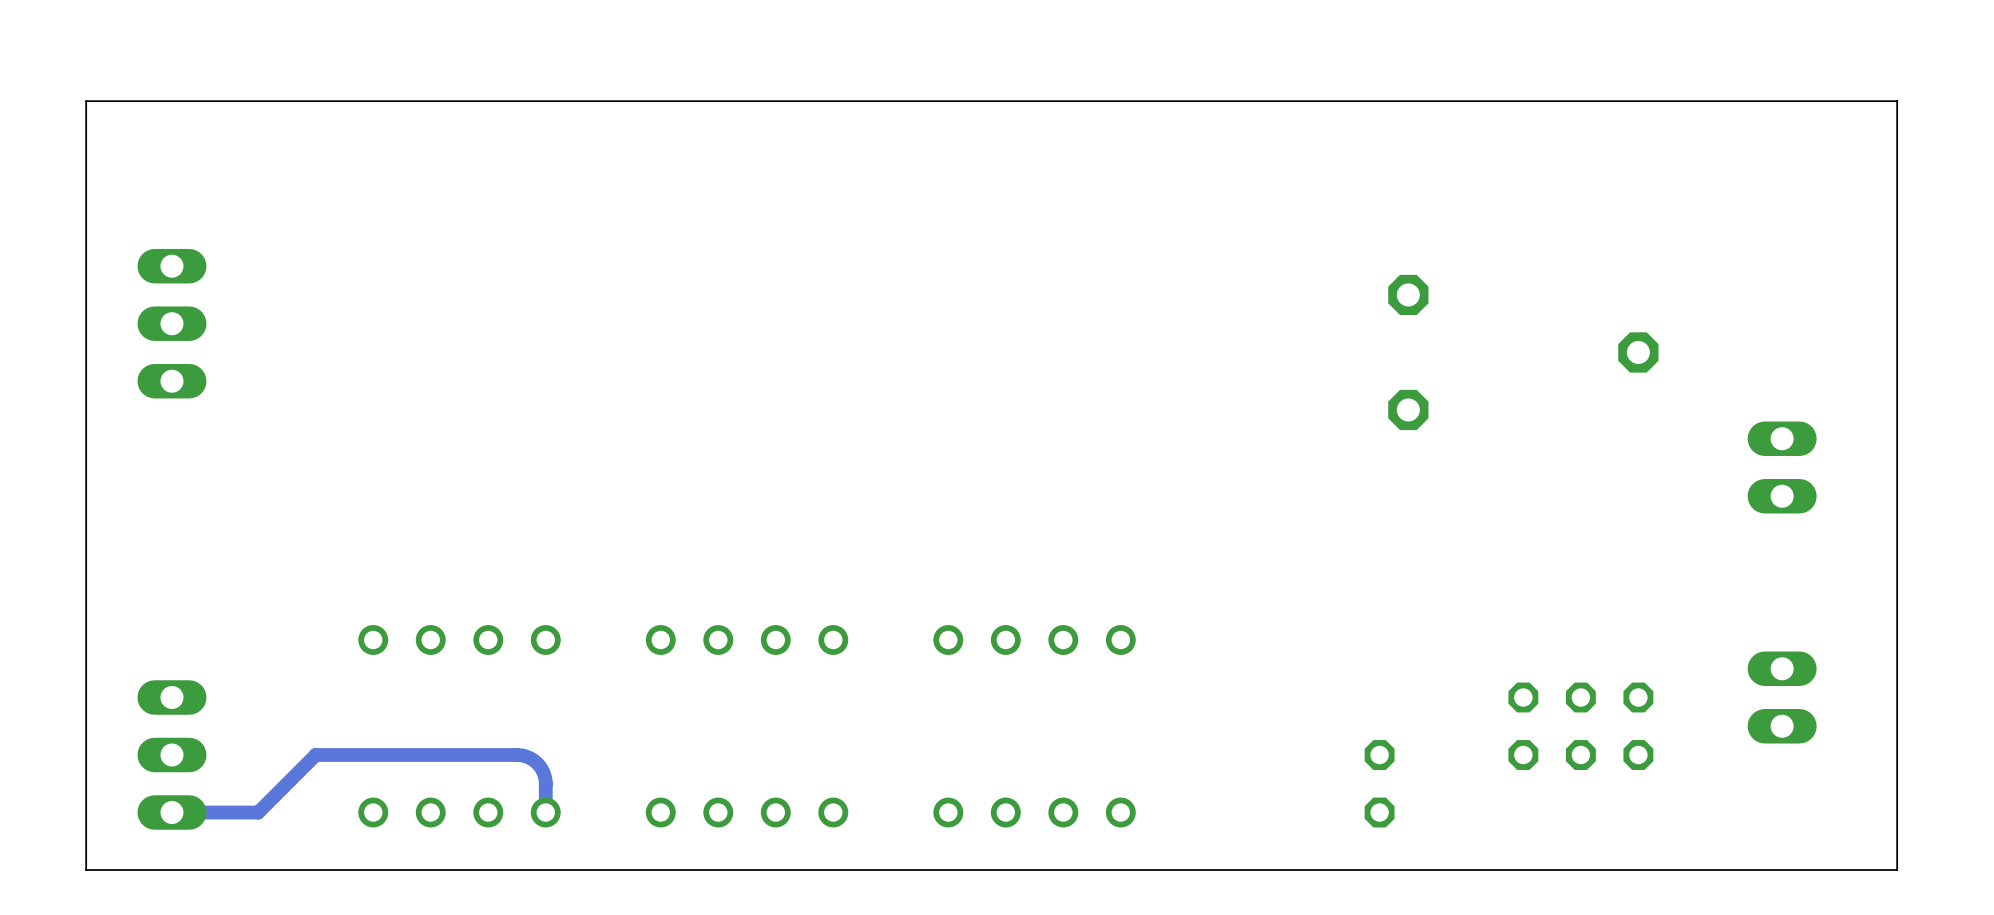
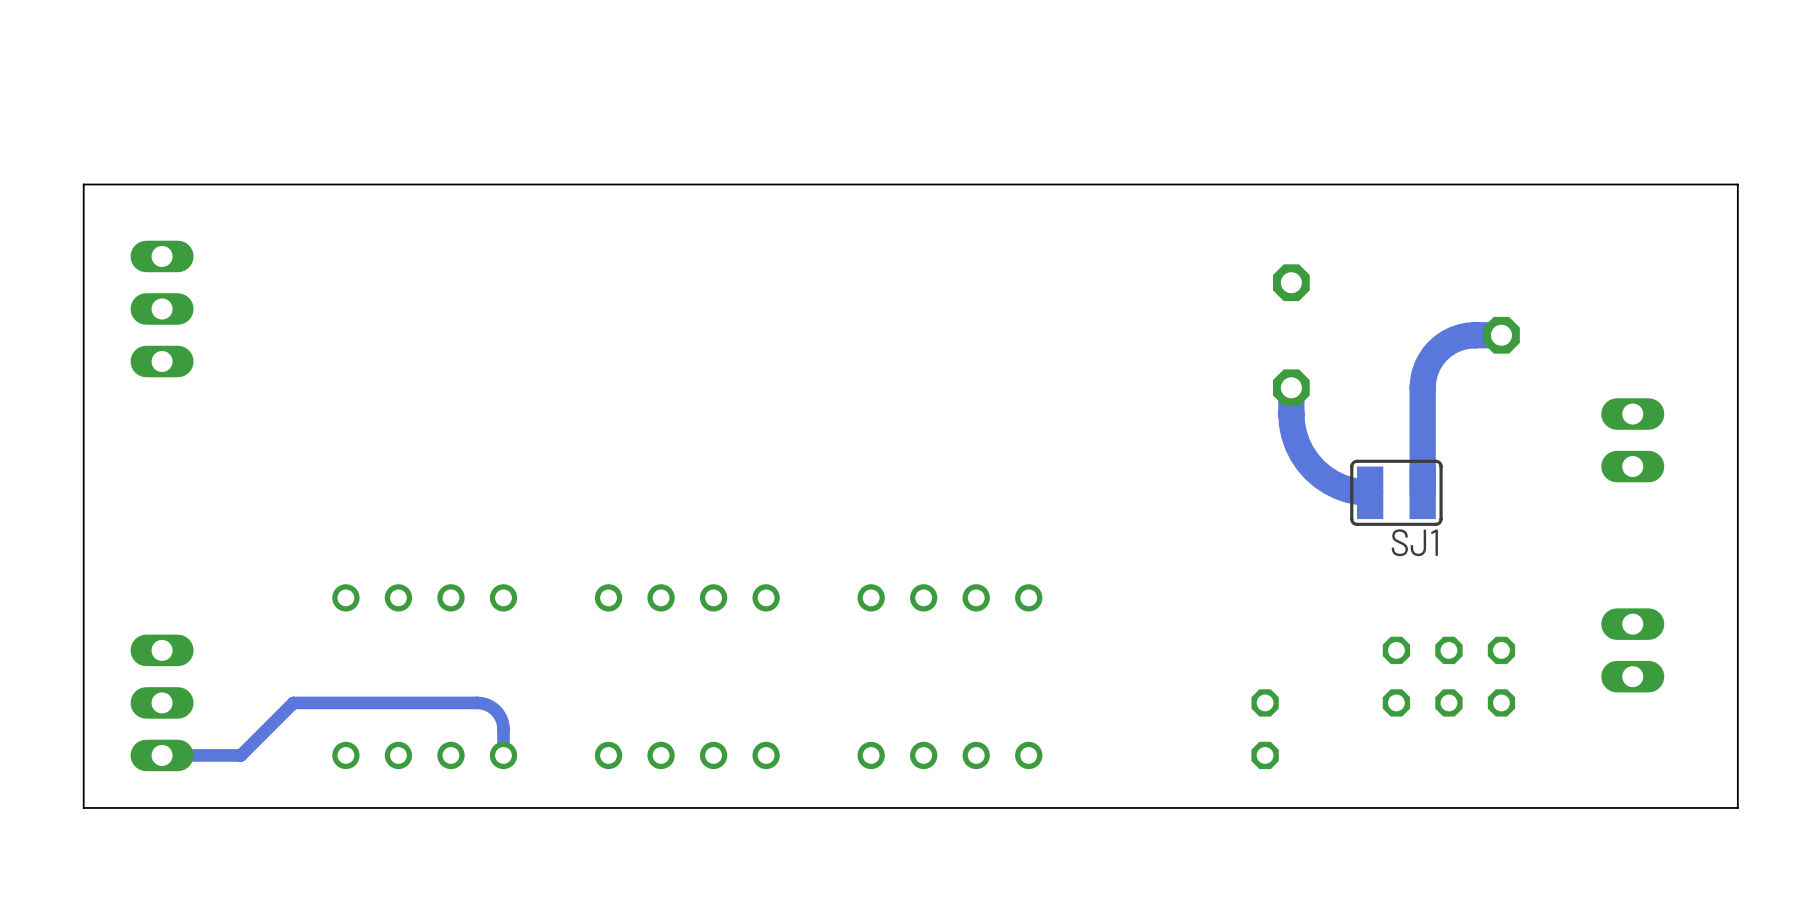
board edge: (1897, 187) (1897, 101) (86, 101) (86, 187) -> (1737, 184) (83, 184)
track: none -> (1501, 335) (1468, 335) (1455, 339) (1438, 350) (1429, 361) (1424, 374) (1422, 387) (1422, 492)
track: none -> (1291, 387) (1291, 414) (1294, 434) (1307, 462) (1330, 482) (1349, 490) (1370, 492)
SJ1: none -> (1396, 492)

